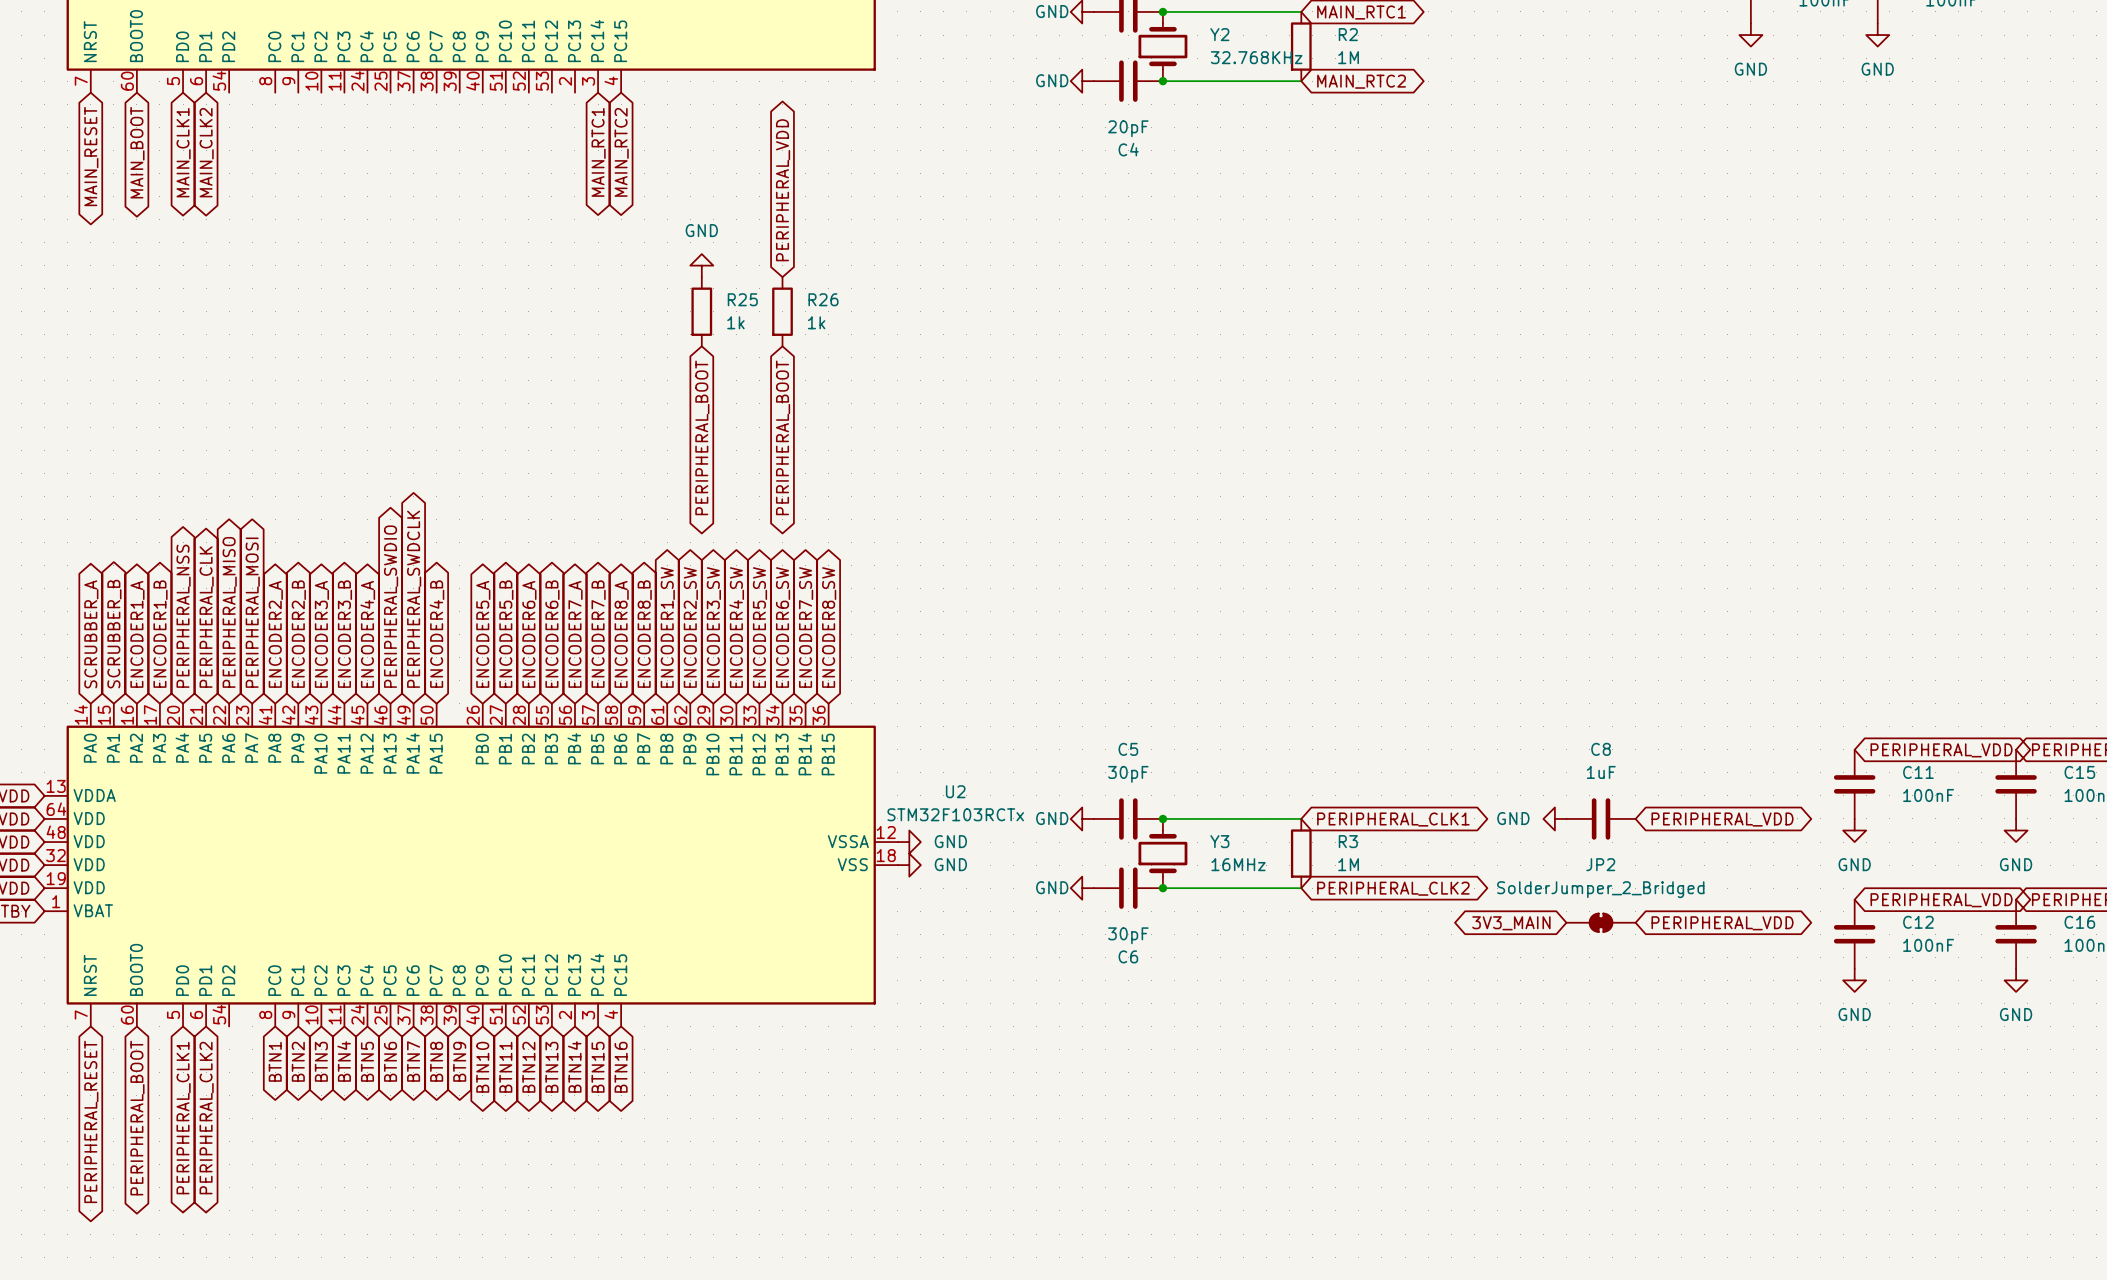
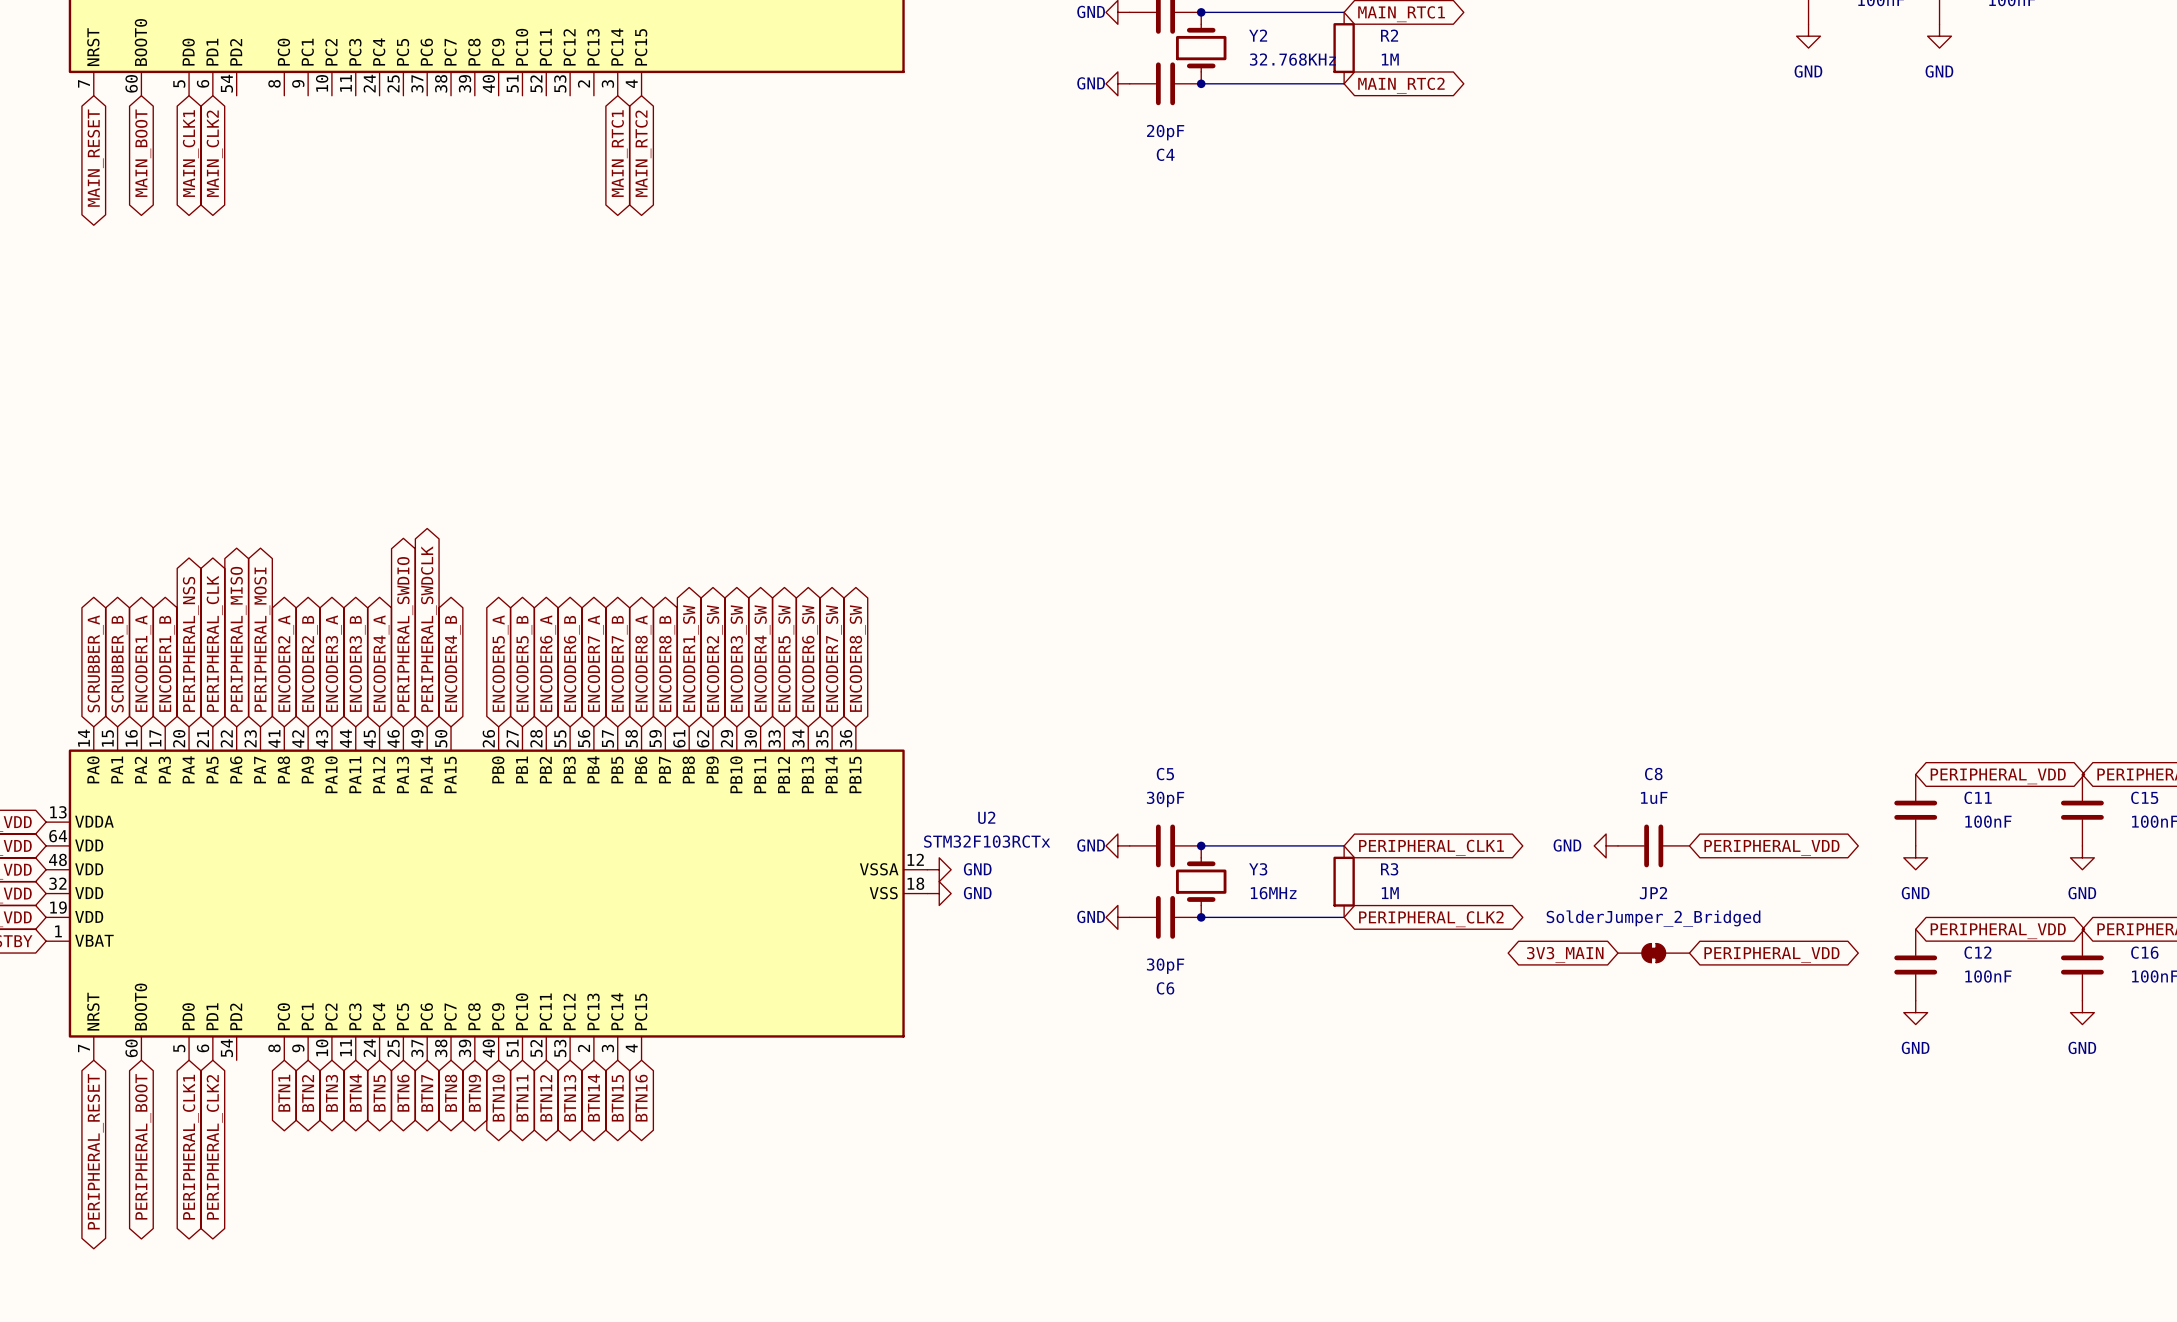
global label: PERIPHERAL_VDD (783, 190) -> none
power symbol: GND (701, 265) -> none
R25: 1k (701, 311) -> none
R26: 1k (782, 311) -> none
global label: PERIPHERAL_BOOT (702, 437) -> none
global label: PERIPHERAL_BOOT (783, 437) -> none

